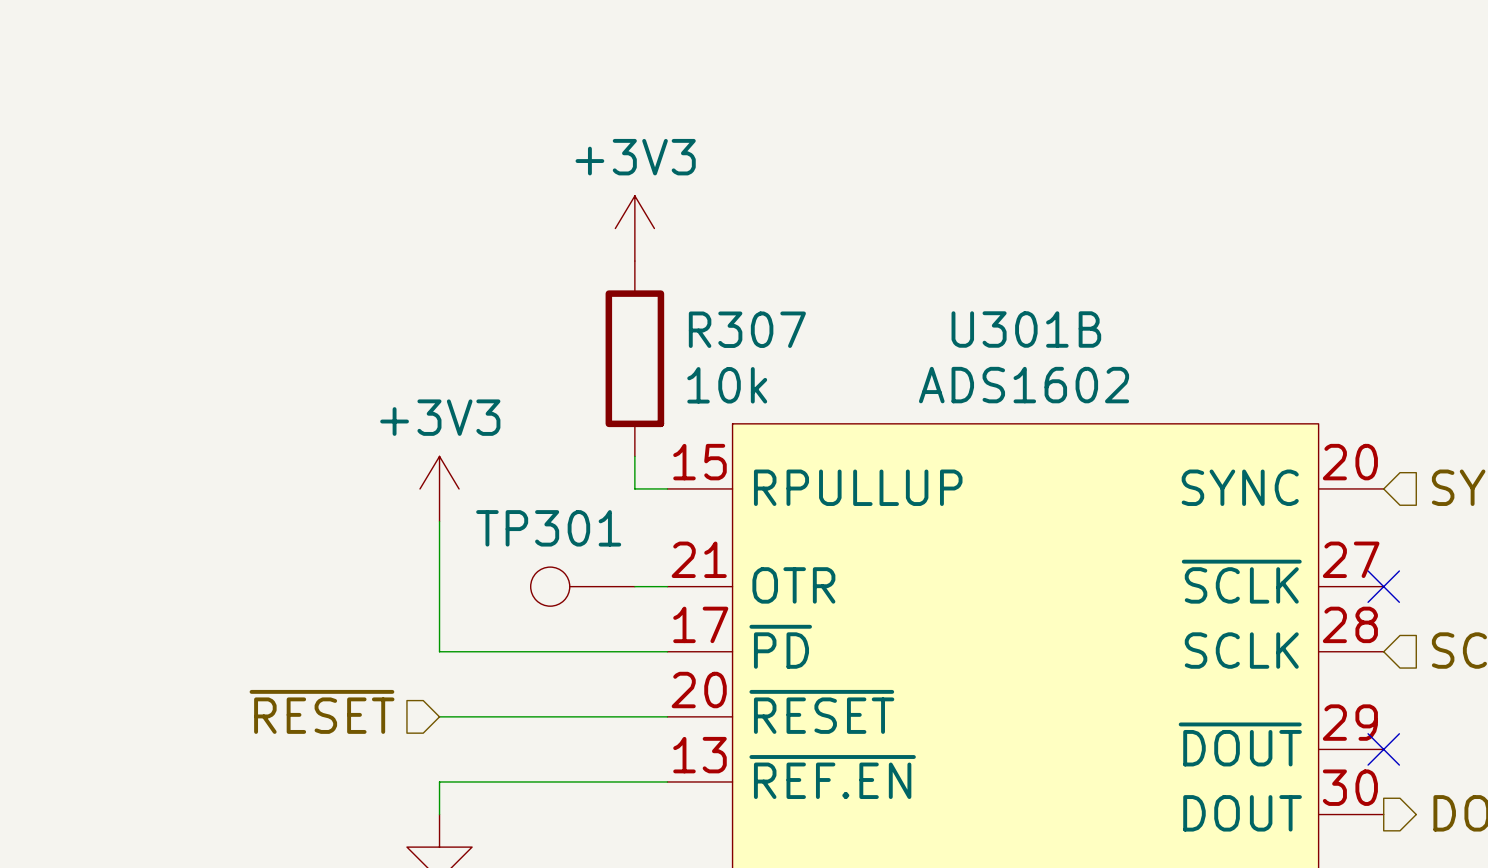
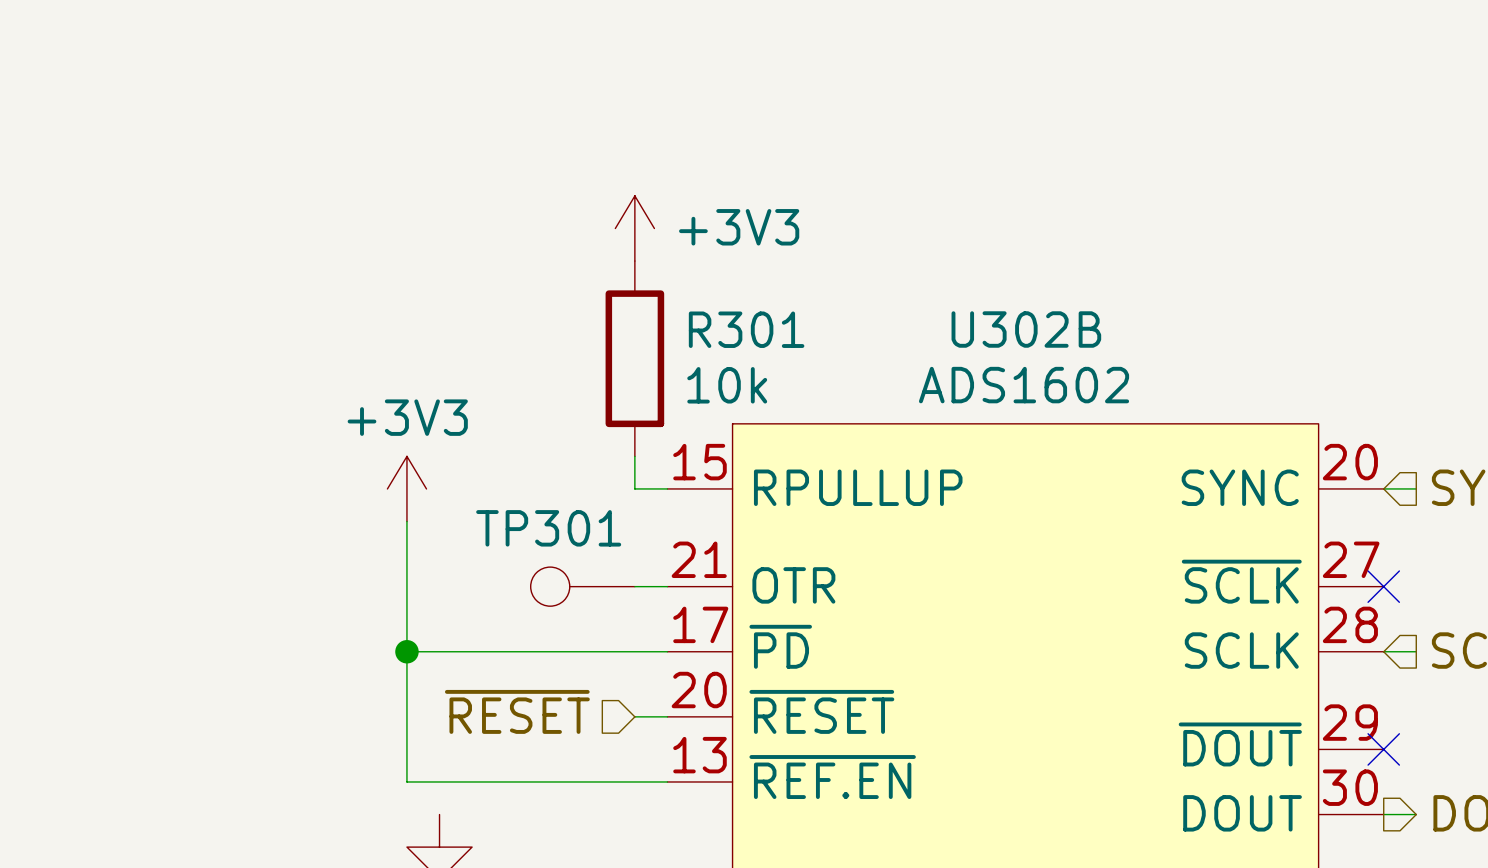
power symbol text position: +3V3 (635, 157) -> +3V3 (739, 227)
R307 name: R307 (747, 329) -> R301 (746, 329)
U301B name: U301B (1026, 329) -> U302B (1026, 329)
power symbol position: +3V3 (439, 488) -> +3V3 (406, 488)
wire: none -> (1383, 488) (1416, 488)
wire: (439, 521) (439, 651) -> (406, 651) (439, 651)
junction: none -> (406, 651)
wire: none -> (1383, 651) (1416, 651)
hierarchical label position: ~{RESET} (322, 711) -> ~{RESET} (517, 711)
wire: (439, 716) (634, 716) -> none
wire: (439, 781) (439, 814) -> (439, 781) (406, 781) (406, 521)
wire: none -> (1383, 814) (1416, 814)

